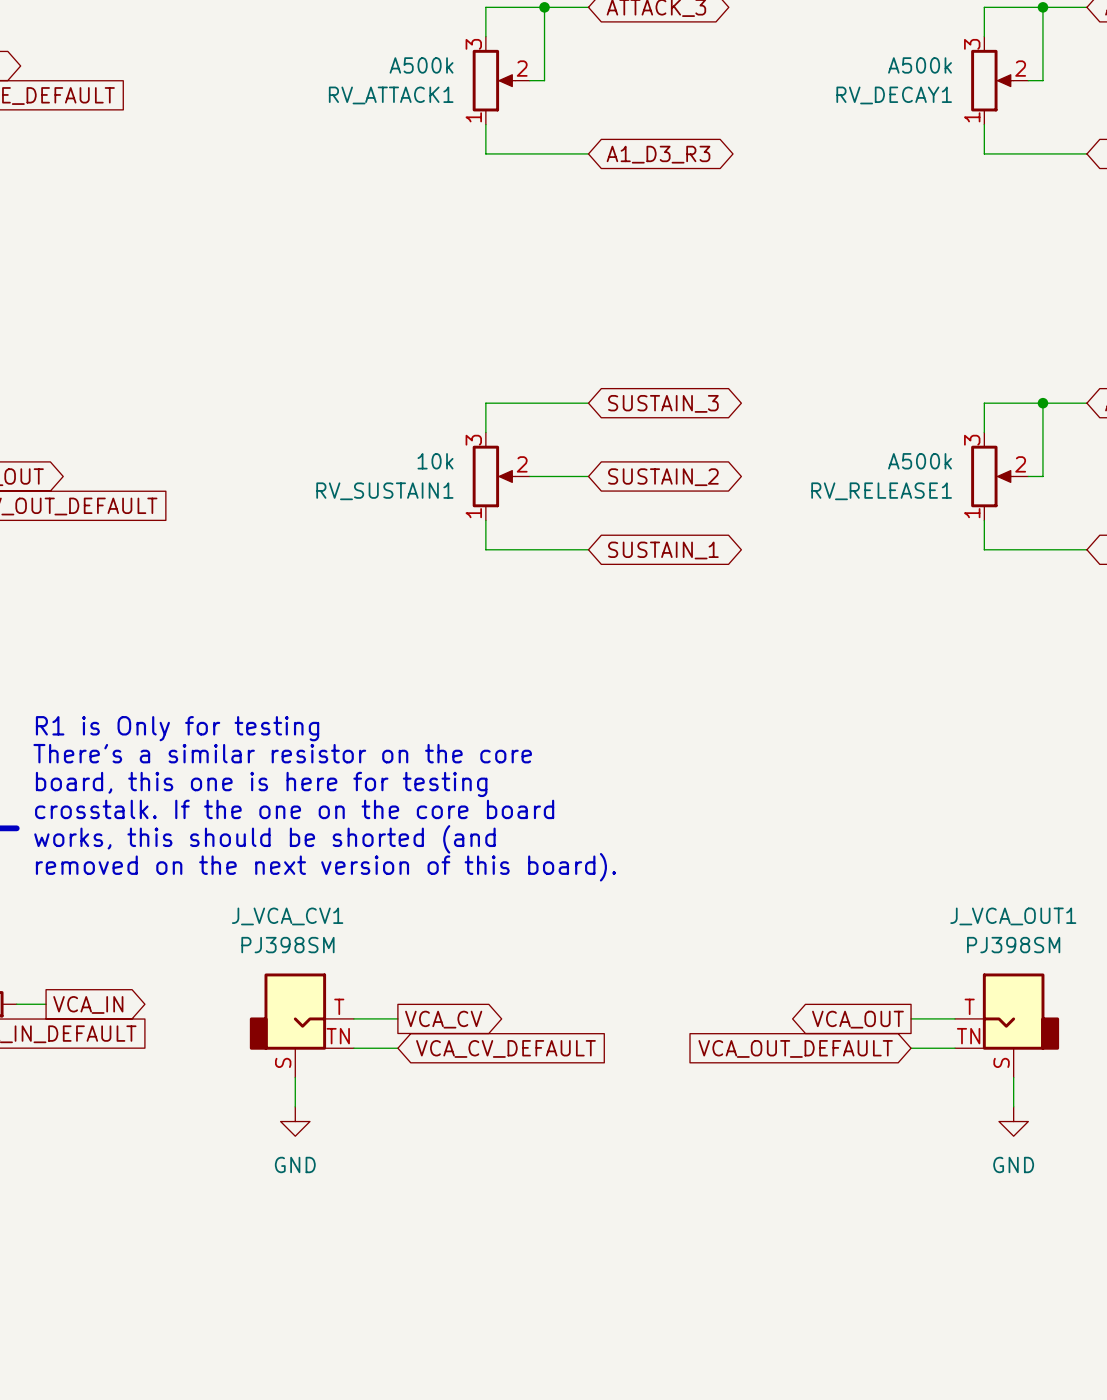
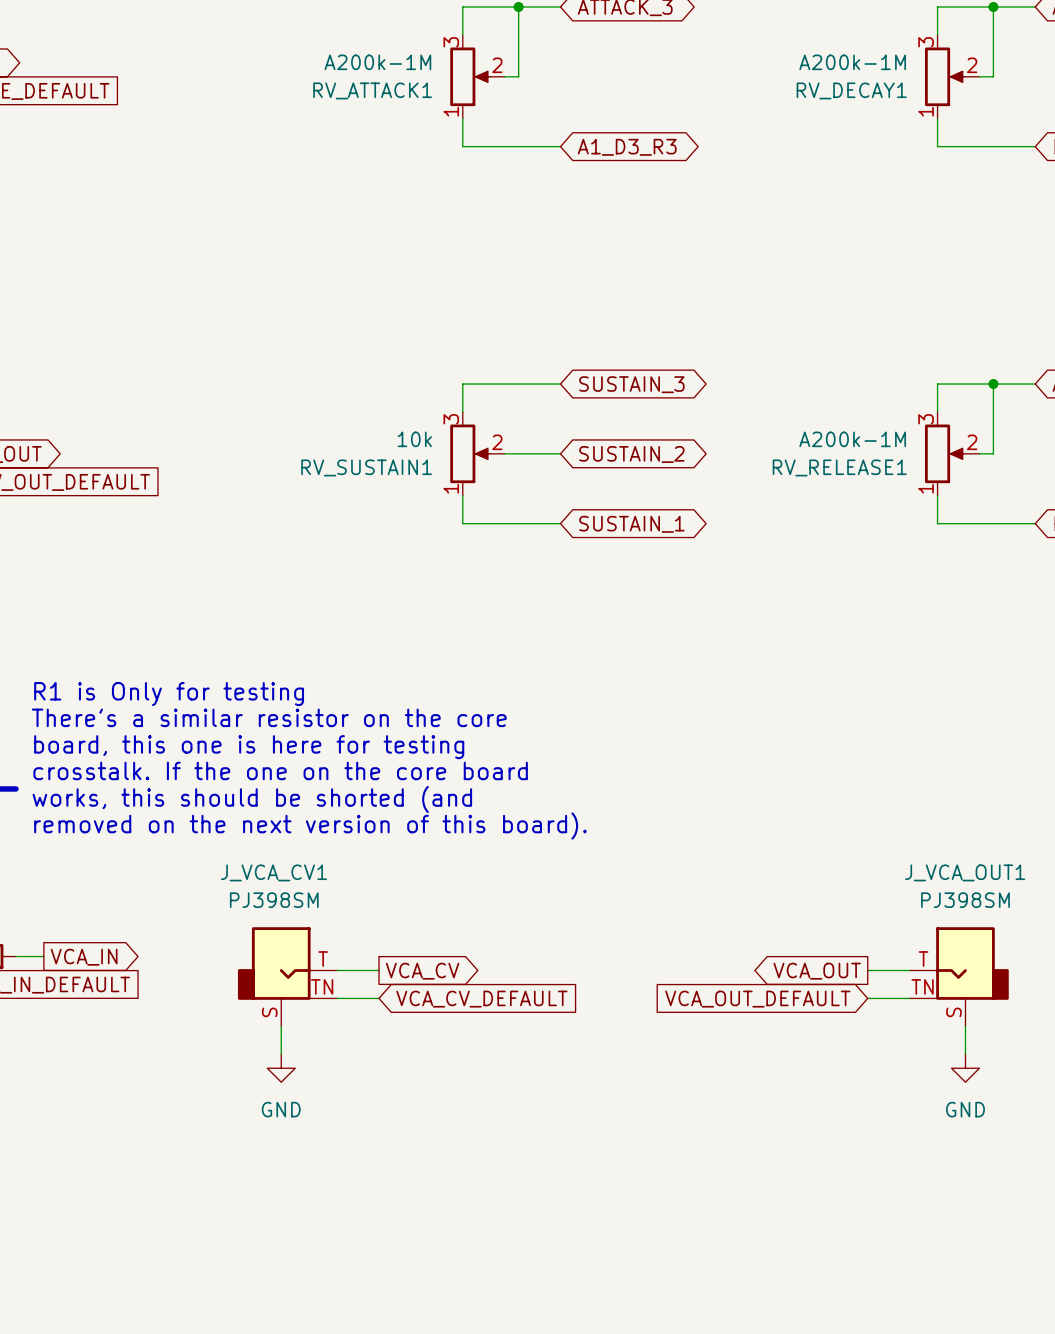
RV_ATTACK1 value: A500k (421, 65) -> A200k-1M (377, 62)
RV_DECAY1 value: A500k (920, 65) -> A200k-1M (852, 62)
RV_RELEASE1 value: A500k (920, 461) -> A200k-1M (852, 439)

